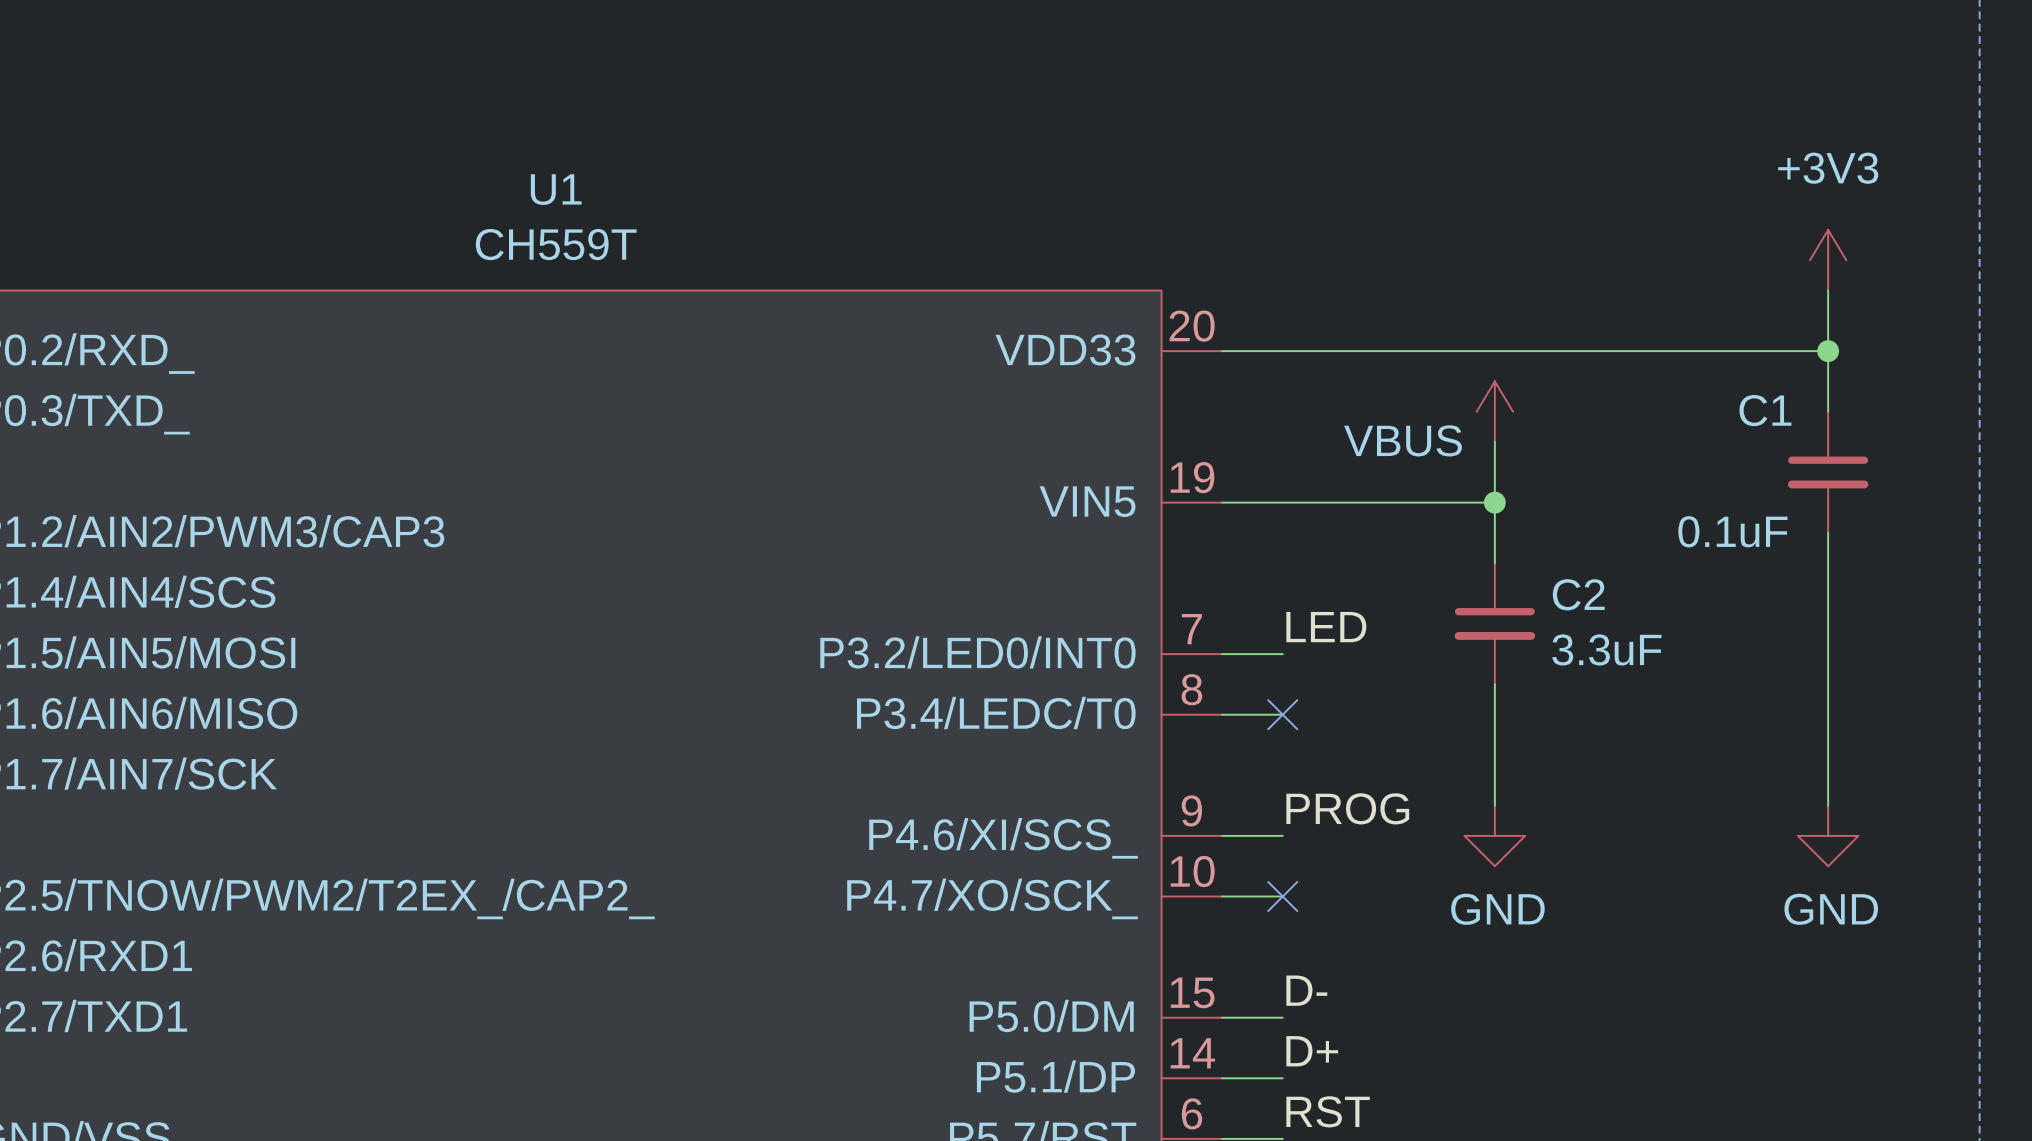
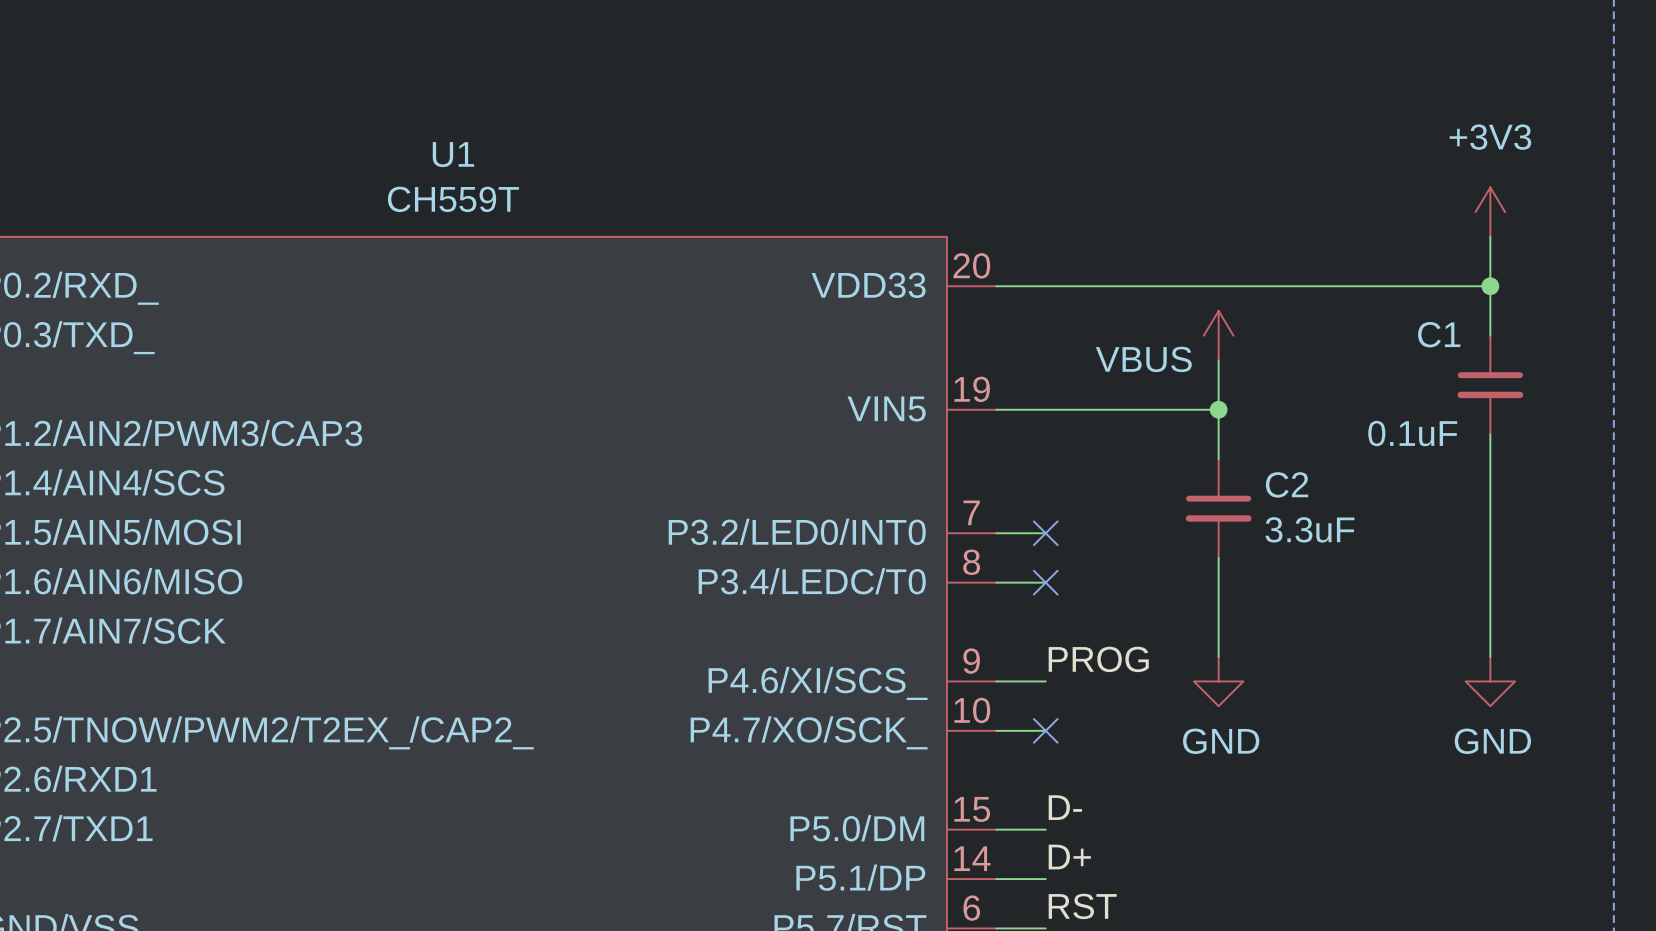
label: LED (1326, 627) -> none
no-connect mark: none -> (1045, 533)

